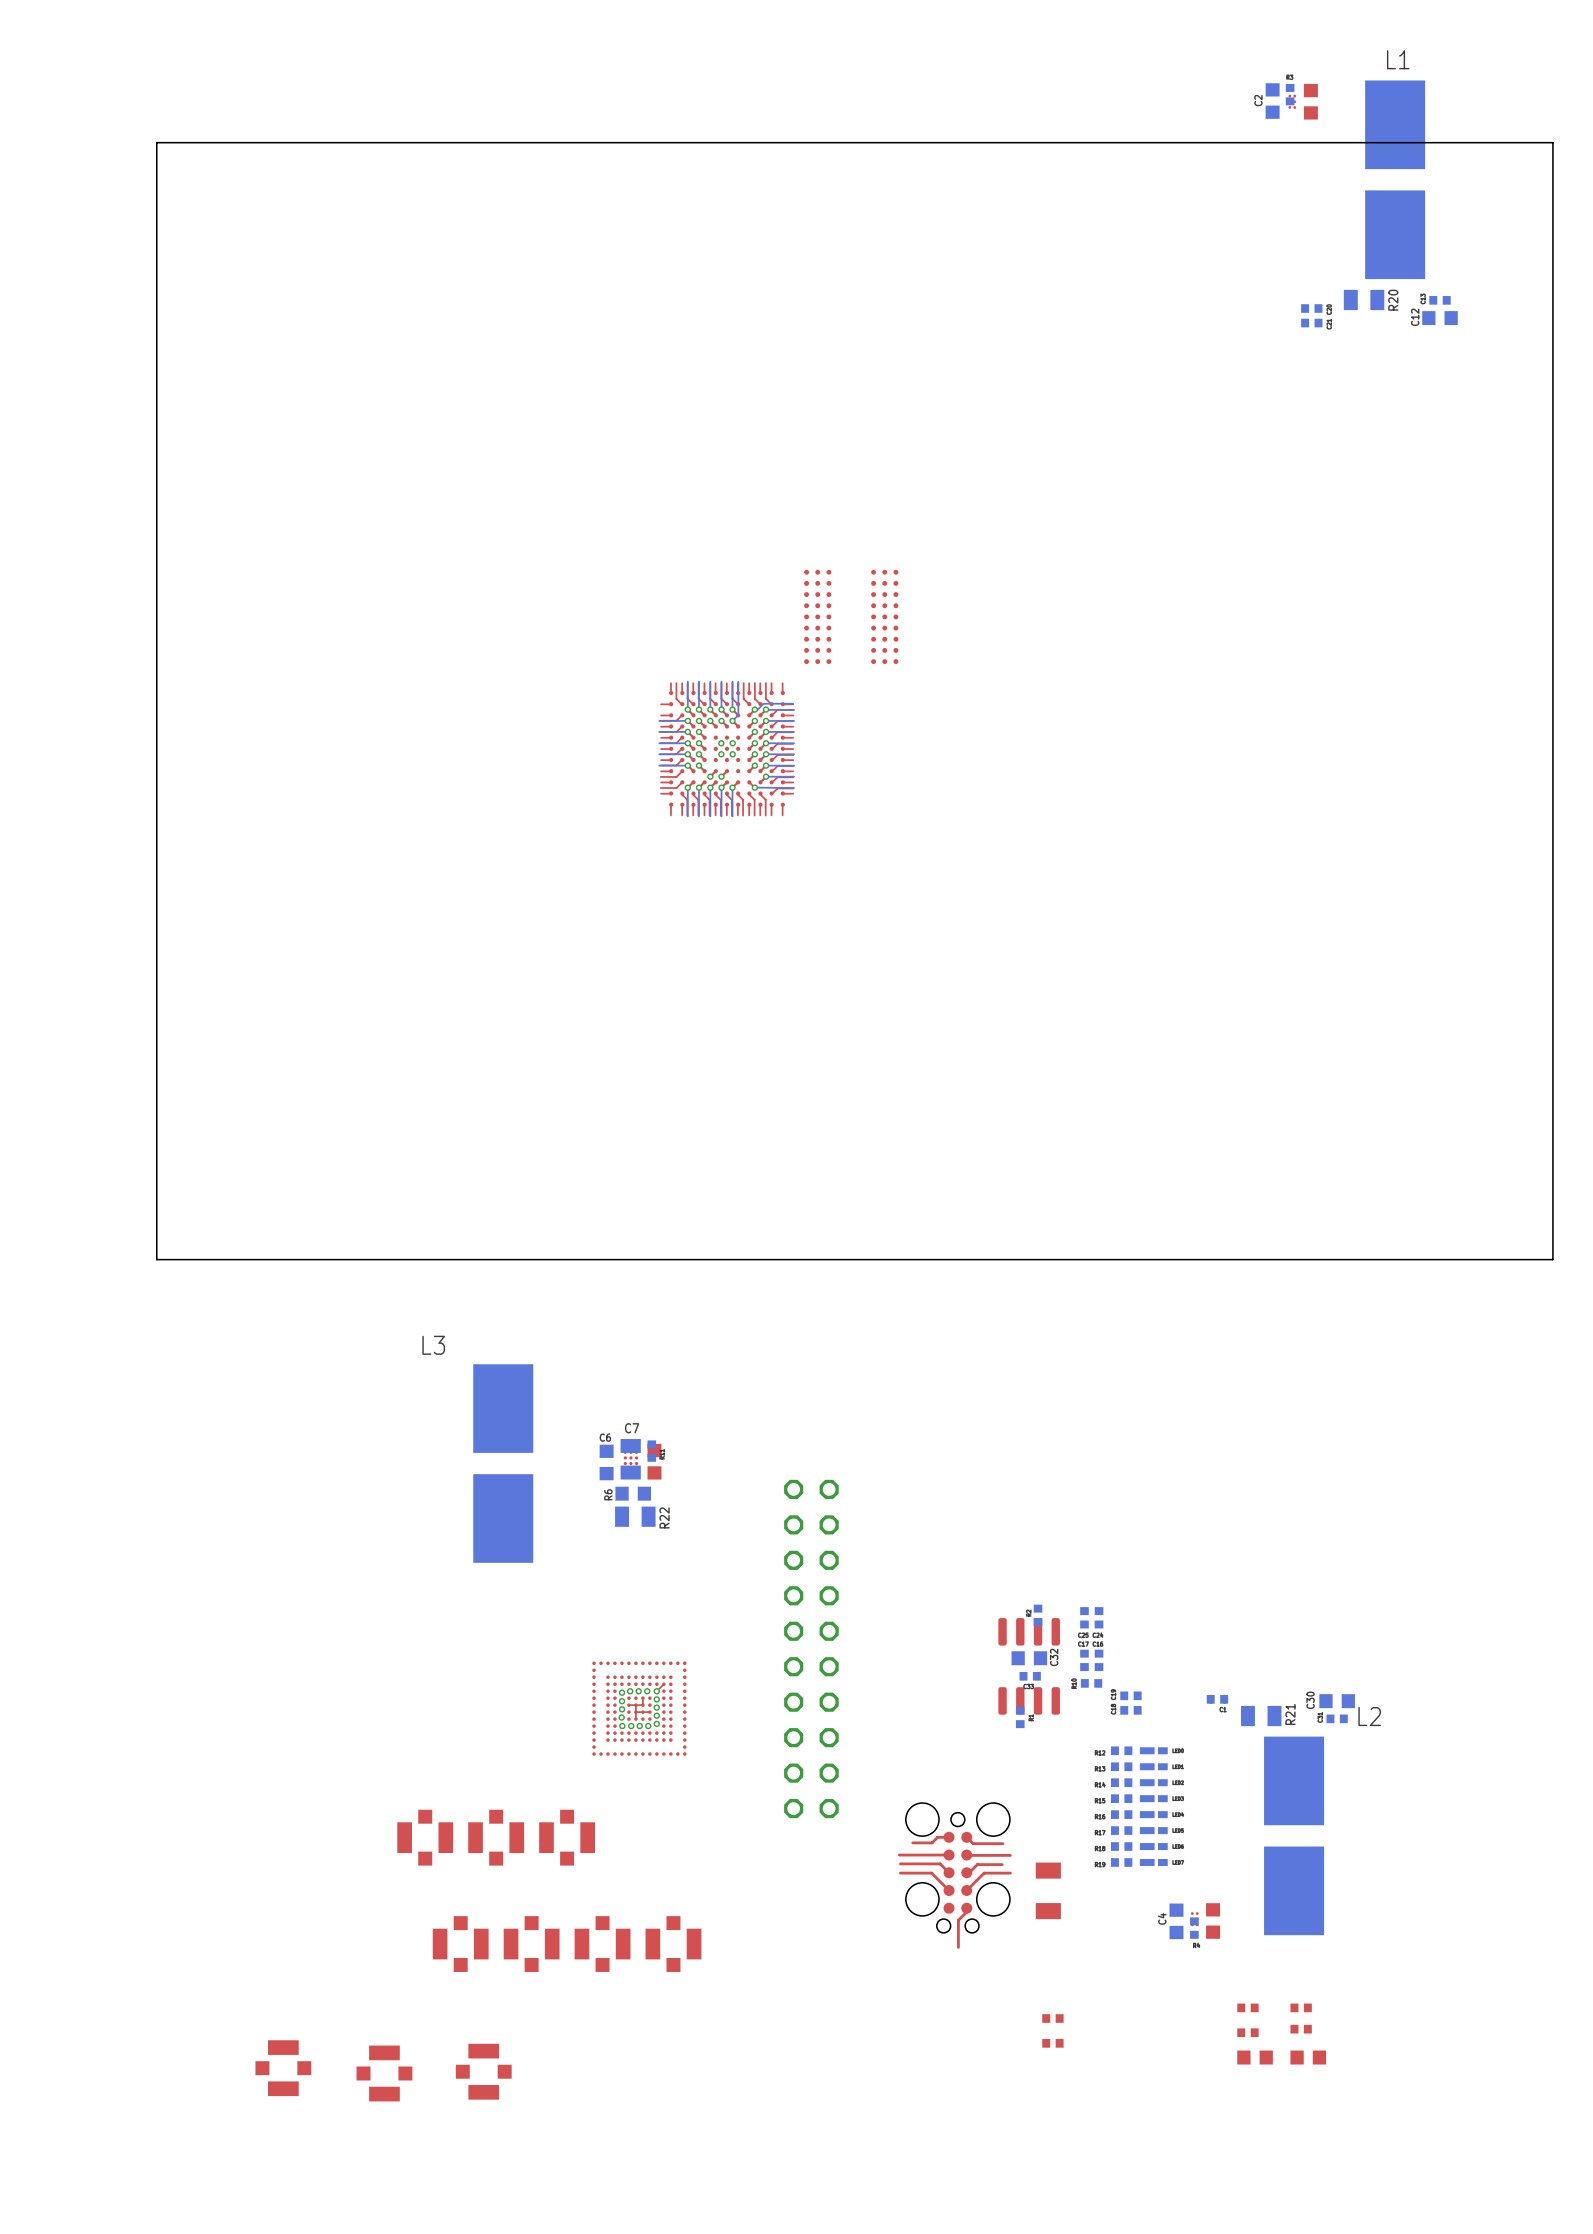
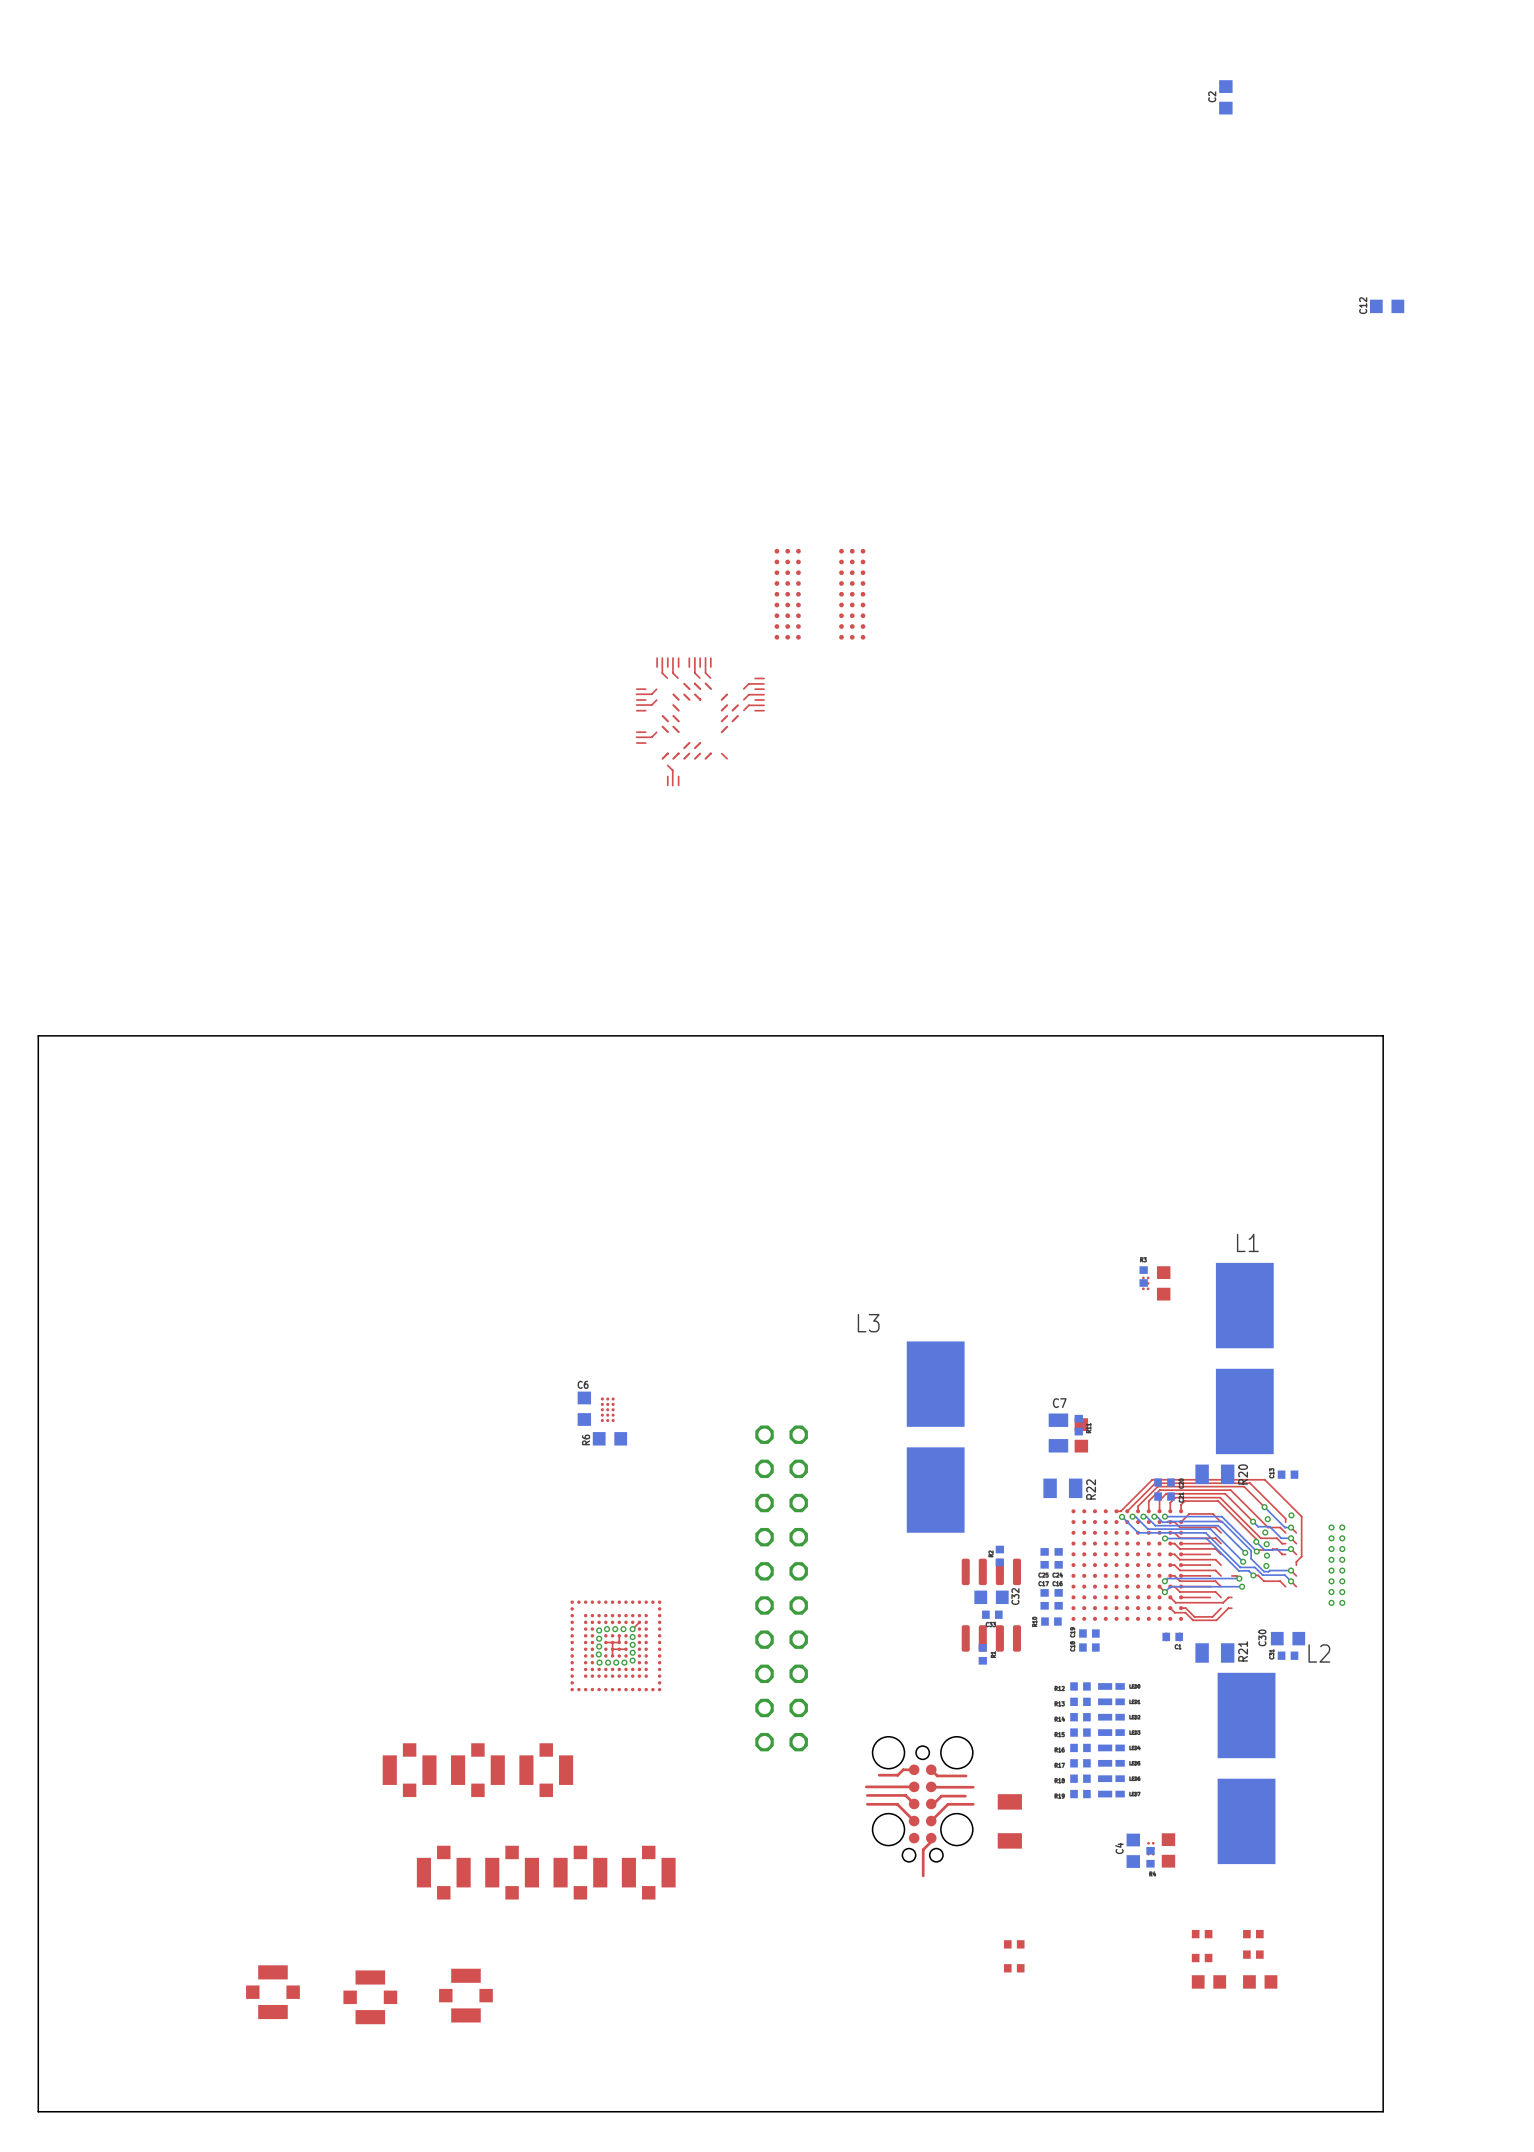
part position: (1290, 94) -> (1143, 1276)
part: (1292, 101) -> none
part: (1310, 101) -> none
board edge: (1552, 142) (156, 142) (156, 1259) (1552, 1259) (1552, 142) -> none
L1 position: (1395, 179) -> (1244, 1358)
R20 position: (1364, 299) -> (1214, 1474)
part position: (1439, 300) -> (1288, 1474)
part position: (1311, 308) -> (1164, 1482)
part position: (1311, 323) -> (1164, 1496)
bottom track: (687, 681) (687, 709) -> none
bottom track: (699, 681) (699, 709) -> none
bottom track: (710, 681) (710, 709) -> none
bottom track: (721, 681) (721, 709) -> none
bottom track: (732, 681) (732, 709) -> none
bottom track: (738, 681) (738, 715) (732, 720) -> none
top track: (670, 683) (670, 692) -> none
top track: (676, 683) (676, 698) (681, 704) -> none
top track: (710, 683) (710, 698) (715, 703) -> none
top track: (743, 683) (743, 698) (748, 704) -> none
top track: (749, 683) (749, 692) -> none
top track: (754, 683) (754, 698) (760, 703) -> none
top track: (760, 683) (760, 692) -> none
top track: (765, 683) (765, 698) (771, 703) -> none
top track: (771, 683) (771, 692) -> none
top track: (782, 683) (782, 692) -> none
bottom track: (793, 703) (763, 703) (757, 709) (754, 709) -> none
top track: (670, 704) (661, 704) -> none
top track: (687, 709) (693, 715) -> none
via: (687, 709) -> none
top track: (699, 709) (704, 715) -> none
via: (699, 709) -> none
via: (710, 709) -> none
via: (721, 709) -> none
via: (732, 709) -> none
top track: (754, 709) (749, 715) -> none
via: (754, 709) -> none
top track: (766, 709) (760, 715) -> none
bottom track: (766, 709) (794, 709) -> none
via: (766, 709) -> none
top track: (687, 720) (693, 726) -> none
bottom track: (687, 720) (659, 720) -> none
via: (687, 720) -> none
via: (699, 720) -> none
via: (710, 720) -> none
via: (721, 720) -> none
top track: (732, 720) (738, 726) -> none
via: (732, 720) -> none
via: (754, 720) -> none
top track: (766, 720) (760, 726) -> none
via: (766, 720) -> none
bottom track: (794, 720) (766, 720) -> none
bottom track: (687, 731) (659, 731) -> none
via: (687, 731) -> none
via: (699, 731) -> none
via: (754, 731) -> none
via: (766, 731) -> none
bottom track: (794, 731) (766, 731) -> none
top track: (687, 732) (693, 737) -> none
top track: (681, 738) (676, 743) (660, 743) -> none
bottom track: (687, 743) (659, 743) -> none
via: (687, 743) -> none
via: (699, 743) -> none
via: (721, 743) -> none
via: (732, 743) -> none
via: (754, 743) -> none
via: (766, 743) -> none
top track: (793, 743) (777, 743) (772, 748) -> none
bottom track: (794, 743) (766, 743) -> none
part: (726, 748) -> none
top track: (670, 749) (661, 749) -> none
top track: (681, 749) (676, 754) (660, 754) -> none
top track: (793, 749) (783, 749) -> none
bottom track: (687, 754) (659, 754) -> none
via: (687, 754) -> none
via: (699, 754) -> none
via: (721, 754) -> none
via: (732, 754) -> none
via: (754, 754) -> none
top track: (766, 754) (760, 760) -> none
via: (766, 754) -> none
top track: (793, 754) (777, 754) (772, 760) -> none
bottom track: (794, 754) (766, 754) -> none
top track: (793, 760) (783, 760) -> none
top track: (687, 765) (693, 771) -> none
bottom track: (687, 765) (659, 765) -> none
via: (687, 765) -> none
top track: (699, 765) (704, 771) -> none
via: (699, 765) -> none
top track: (754, 765) (749, 771) -> none
via: (754, 765) -> none
top track: (766, 765) (760, 771) -> none
via: (766, 765) -> none
bottom track: (794, 765) (766, 765) -> none
top track: (793, 766) (777, 766) (772, 771) -> none
top track: (681, 771) (676, 776) (660, 776) -> none
top track: (793, 771) (783, 771) -> none
via: (710, 776) -> none
via: (721, 776) -> none
top track: (766, 776) (760, 782) -> none
via: (766, 776) -> none
bottom track: (794, 776) (766, 776) -> none
top track: (793, 777) (777, 777) (772, 782) -> none
top track: (670, 782) (661, 782) -> none
top track: (681, 782) (676, 788) (660, 788) -> none
top track: (793, 782) (783, 782) -> none
bottom track: (687, 787) (687, 816) -> none
via: (687, 787) -> none
bottom track: (699, 787) (699, 816) -> none
via: (699, 787) -> none
bottom track: (710, 787) (710, 816) -> none
via: (710, 787) -> none
bottom track: (721, 787) (721, 816) -> none
via: (721, 787) -> none
bottom track: (732, 787) (732, 816) -> none
via: (732, 787) -> none
bottom track: (754, 787) (794, 787) -> none
via: (754, 787) -> none
top track: (793, 788) (777, 788) (772, 793) -> none
top track: (670, 793) (661, 793) -> none
top track: (793, 793) (783, 793) -> none
top track: (682, 794) (687, 799) (687, 815) -> none
top track: (704, 794) (709, 799) (709, 815) -> none
top track: (715, 794) (720, 799) (720, 815) -> none
top track: (726, 794) (731, 799) (731, 815) -> none
top track: (737, 794) (743, 799) (743, 815) -> none
top track: (749, 794) (754, 799) (754, 815) -> none
top track: (760, 794) (765, 799) (765, 815) -> none
top track: (670, 806) (670, 815) -> none
top track: (682, 806) (682, 815) -> none
top track: (715, 806) (715, 815) -> none
top track: (726, 806) (726, 815) -> none
top track: (737, 806) (737, 815) -> none
top track: (749, 806) (749, 815) -> none
top track: (760, 806) (760, 815) -> none
top track: (771, 806) (771, 815) -> none
top track: (782, 806) (782, 815) -> none
board edge: none -> (1383, 1035) (38, 1035) (38, 2111) (1383, 2111) (1383, 1035)
part: none -> (1145, 1283)
part: none -> (1163, 1283)
part position: (651, 1451) -> (1078, 1425)
C7 position: (630, 1459) -> (1058, 1432)
part: (654, 1461) -> none
L3 position: (503, 1463) -> (935, 1437)
part: none -> (1081, 1435)
R22 position: (635, 1516) -> (1062, 1488)
top track: none -> (1264, 1507) (1244, 1486) (1157, 1486) (1138, 1506) (1138, 1511)
bottom track: none -> (1264, 1507) (1284, 1527) (1291, 1527)
via: none -> (1264, 1507)
top track: none -> (1116, 1511) (1120, 1511) (1152, 1479) (1264, 1479) (1301, 1516) (1301, 1556) (1296, 1561) (1296, 1565)
top track: none -> (1127, 1511) (1155, 1483) (1250, 1483) (1285, 1518) (1285, 1522)
top track: none -> (1148, 1511) (1148, 1501) (1159, 1490) (1230, 1490) (1268, 1527) (1280, 1527) (1285, 1532)
top track: none -> (1159, 1511) (1159, 1500) (1166, 1493) (1225, 1493) (1253, 1521)
top track: none -> (1170, 1511) (1170, 1502) (1175, 1497) (1220, 1497) (1260, 1538) (1276, 1538) (1282, 1543) (1285, 1543)
top track: none -> (1181, 1511) (1181, 1504) (1184, 1501) (1218, 1501) (1256, 1539) (1256, 1541)
via: none -> (1291, 1515)
via: none -> (1122, 1516)
bottom track: none -> (1122, 1516) (1138, 1532) (1205, 1532) (1240, 1567) (1254, 1567) (1262, 1575) (1284, 1575) (1291, 1581)
bottom track: none -> (1132, 1516) (1135, 1516) (1147, 1529) (1210, 1529) (1243, 1561)
via: none -> (1132, 1516)
bottom track: none -> (1143, 1516) (1146, 1516) (1155, 1525) (1218, 1525) (1245, 1552)
via: none -> (1143, 1516)
bottom track: none -> (1154, 1516) (1157, 1516) (1162, 1522) (1221, 1521) (1251, 1550) (1251, 1558) (1264, 1571) (1291, 1570)
via: none -> (1154, 1516)
bottom track: none -> (1164, 1516) (1221, 1516) (1256, 1551)
via: none -> (1164, 1516)
via: none -> (1267, 1519)
bottom track: none -> (1253, 1521) (1258, 1526) (1269, 1526) (1281, 1538) (1291, 1538)
via: none -> (1253, 1521)
top track: none -> (1170, 1522) (1174, 1522) (1179, 1527) (1215, 1527) (1221, 1532)
top track: none -> (1181, 1522) (1189, 1513) (1212, 1513) (1221, 1522)
top track: none -> (1291, 1527) (1296, 1532)
via: none -> (1291, 1527)
via: none -> (1331, 1527)
via: none -> (1342, 1527)
via: none -> (1265, 1532)
top track: none -> (1170, 1532) (1174, 1532) (1179, 1538) (1215, 1538) (1221, 1543)
top track: none -> (1291, 1538) (1296, 1543)
via: none -> (1291, 1538)
bottom track: none -> (1165, 1538) (1206, 1538) (1238, 1570) (1248, 1570) (1253, 1575)
via: none -> (1165, 1538)
via: none -> (1331, 1538)
via: none -> (1342, 1538)
bottom track: none -> (1256, 1541) (1264, 1549) (1291, 1549)
via: none -> (1256, 1541)
top track: none -> (1170, 1543) (1174, 1543) (1179, 1548) (1215, 1548) (1221, 1554)
top track: none -> (1210, 1543) (1181, 1543)
via: none -> (1266, 1544)
top track: none -> (1291, 1549) (1296, 1554)
via: none -> (1291, 1549)
via: none -> (1331, 1549)
via: none -> (1342, 1549)
top track: none -> (1256, 1551) (1277, 1549) (1282, 1554) (1285, 1554)
via: none -> (1256, 1551)
via: none -> (1245, 1552)
top track: none -> (1170, 1554) (1174, 1554) (1179, 1559) (1215, 1559) (1221, 1565)
top track: none -> (1210, 1554) (1181, 1554)
via: none -> (1266, 1555)
via: none -> (1331, 1559)
via: none -> (1342, 1559)
via: none -> (1243, 1561)
part: none -> (1127, 1565)
top track: none -> (1170, 1565) (1174, 1565) (1179, 1570) (1215, 1570) (1221, 1575)
top track: none -> (1210, 1565) (1181, 1565)
via: none -> (1266, 1566)
top track: none -> (1291, 1570) (1296, 1575)
via: none -> (1291, 1570)
via: none -> (1331, 1570)
via: none -> (1342, 1570)
top track: none -> (1170, 1575) (1174, 1575) (1179, 1581) (1215, 1581) (1221, 1586)
top track: none -> (1210, 1575) (1181, 1575)
top track: none -> (1253, 1575) (1258, 1575) (1263, 1581) (1280, 1581) (1285, 1586)
via: none -> (1253, 1575)
top track: none -> (1231, 1575) (1236, 1575) (1239, 1578)
bottom track: none -> (1239, 1578) (1167, 1578) (1164, 1581)
via: none -> (1239, 1578)
via: none -> (1164, 1581)
top track: none -> (1291, 1581) (1296, 1586)
via: none -> (1291, 1581)
via: none -> (1331, 1581)
via: none -> (1342, 1581)
top track: none -> (1159, 1586) (1164, 1591)
top track: none -> (1170, 1586) (1174, 1586) (1179, 1591) (1215, 1591) (1221, 1597)
bottom track: none -> (1242, 1586) (1170, 1586) (1164, 1592)
via: none -> (1242, 1586)
via: none -> (1164, 1592)
via: none -> (1331, 1592)
via: none -> (1342, 1592)
top track: none -> (1170, 1597) (1175, 1602) (1223, 1602) (1228, 1597) (1231, 1597)
top track: none -> (1210, 1597) (1181, 1597)
via: none -> (1331, 1602)
via: none -> (1342, 1602)
top track: none -> (1170, 1608) (1174, 1612) (1185, 1612) (1193, 1620) (1216, 1620) (1228, 1608) (1231, 1608)
top track: none -> (1181, 1608) (1185, 1608) (1194, 1616) (1212, 1616) (1221, 1608)

